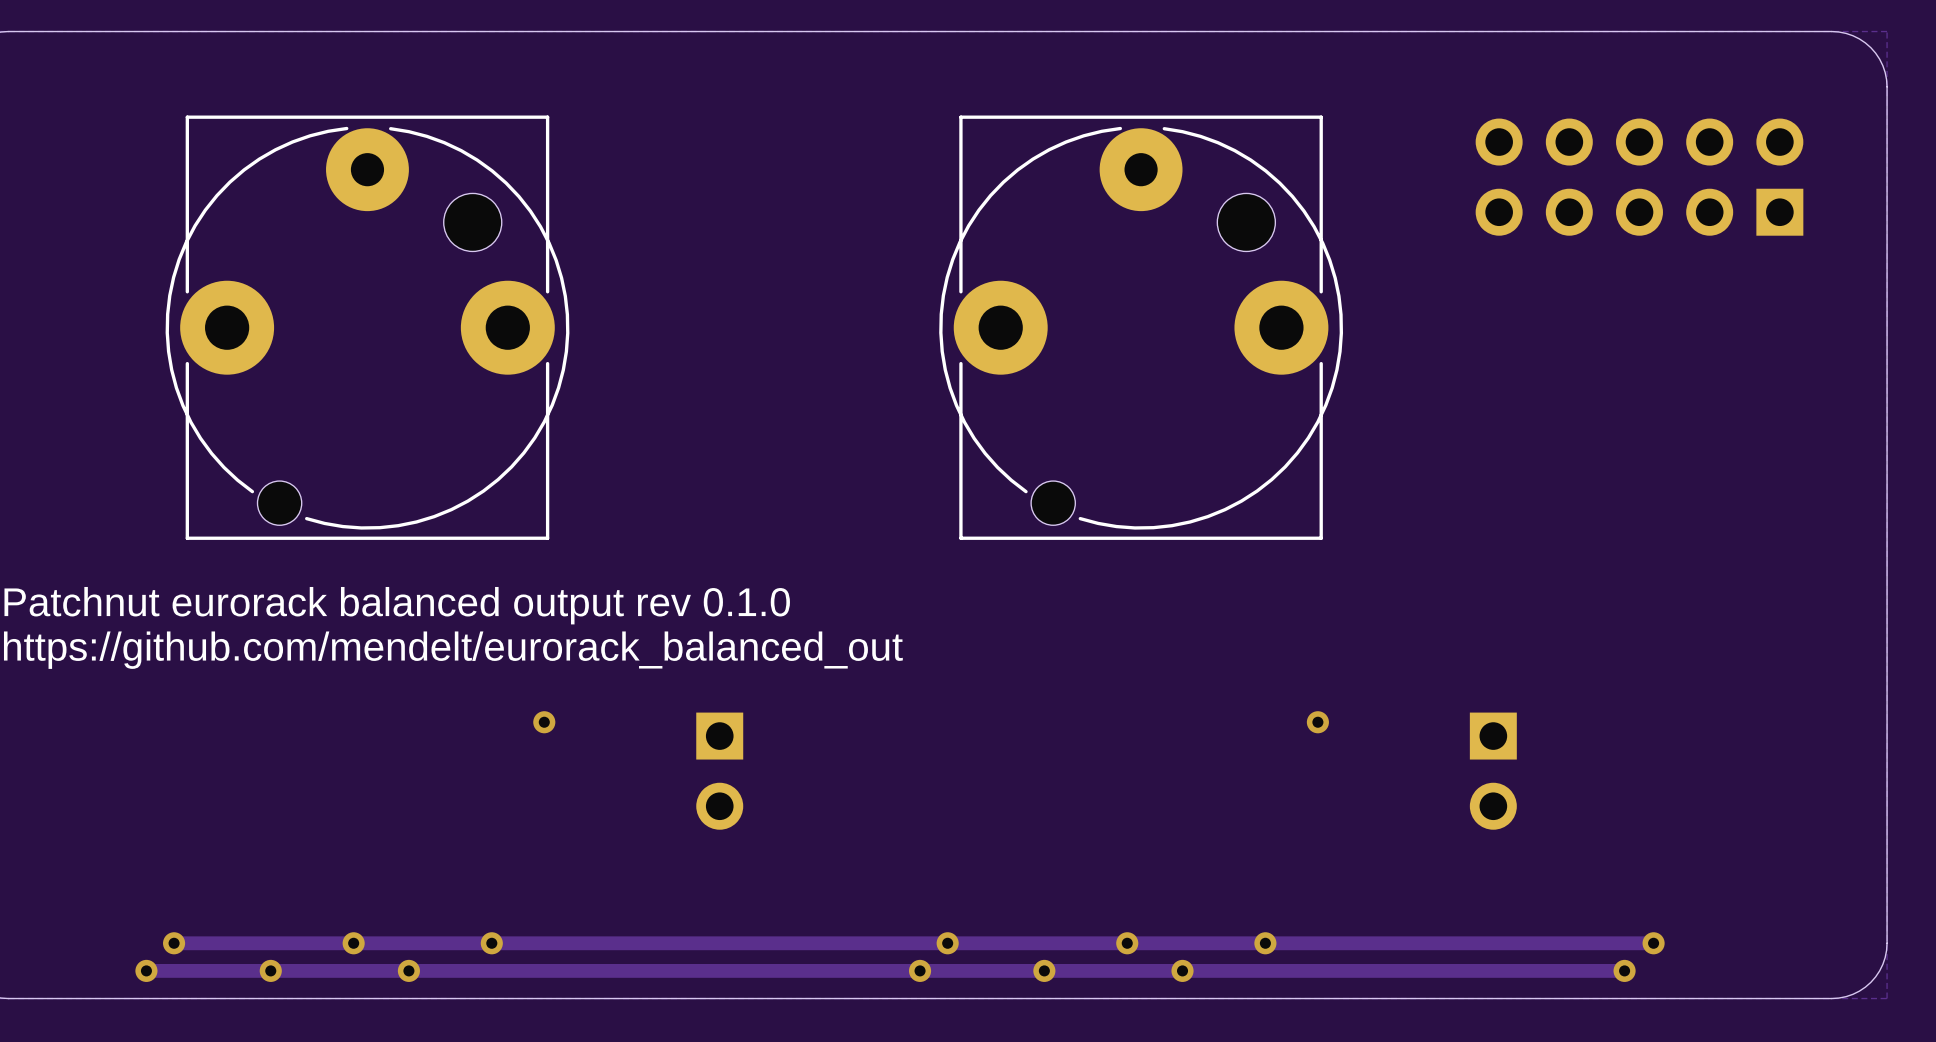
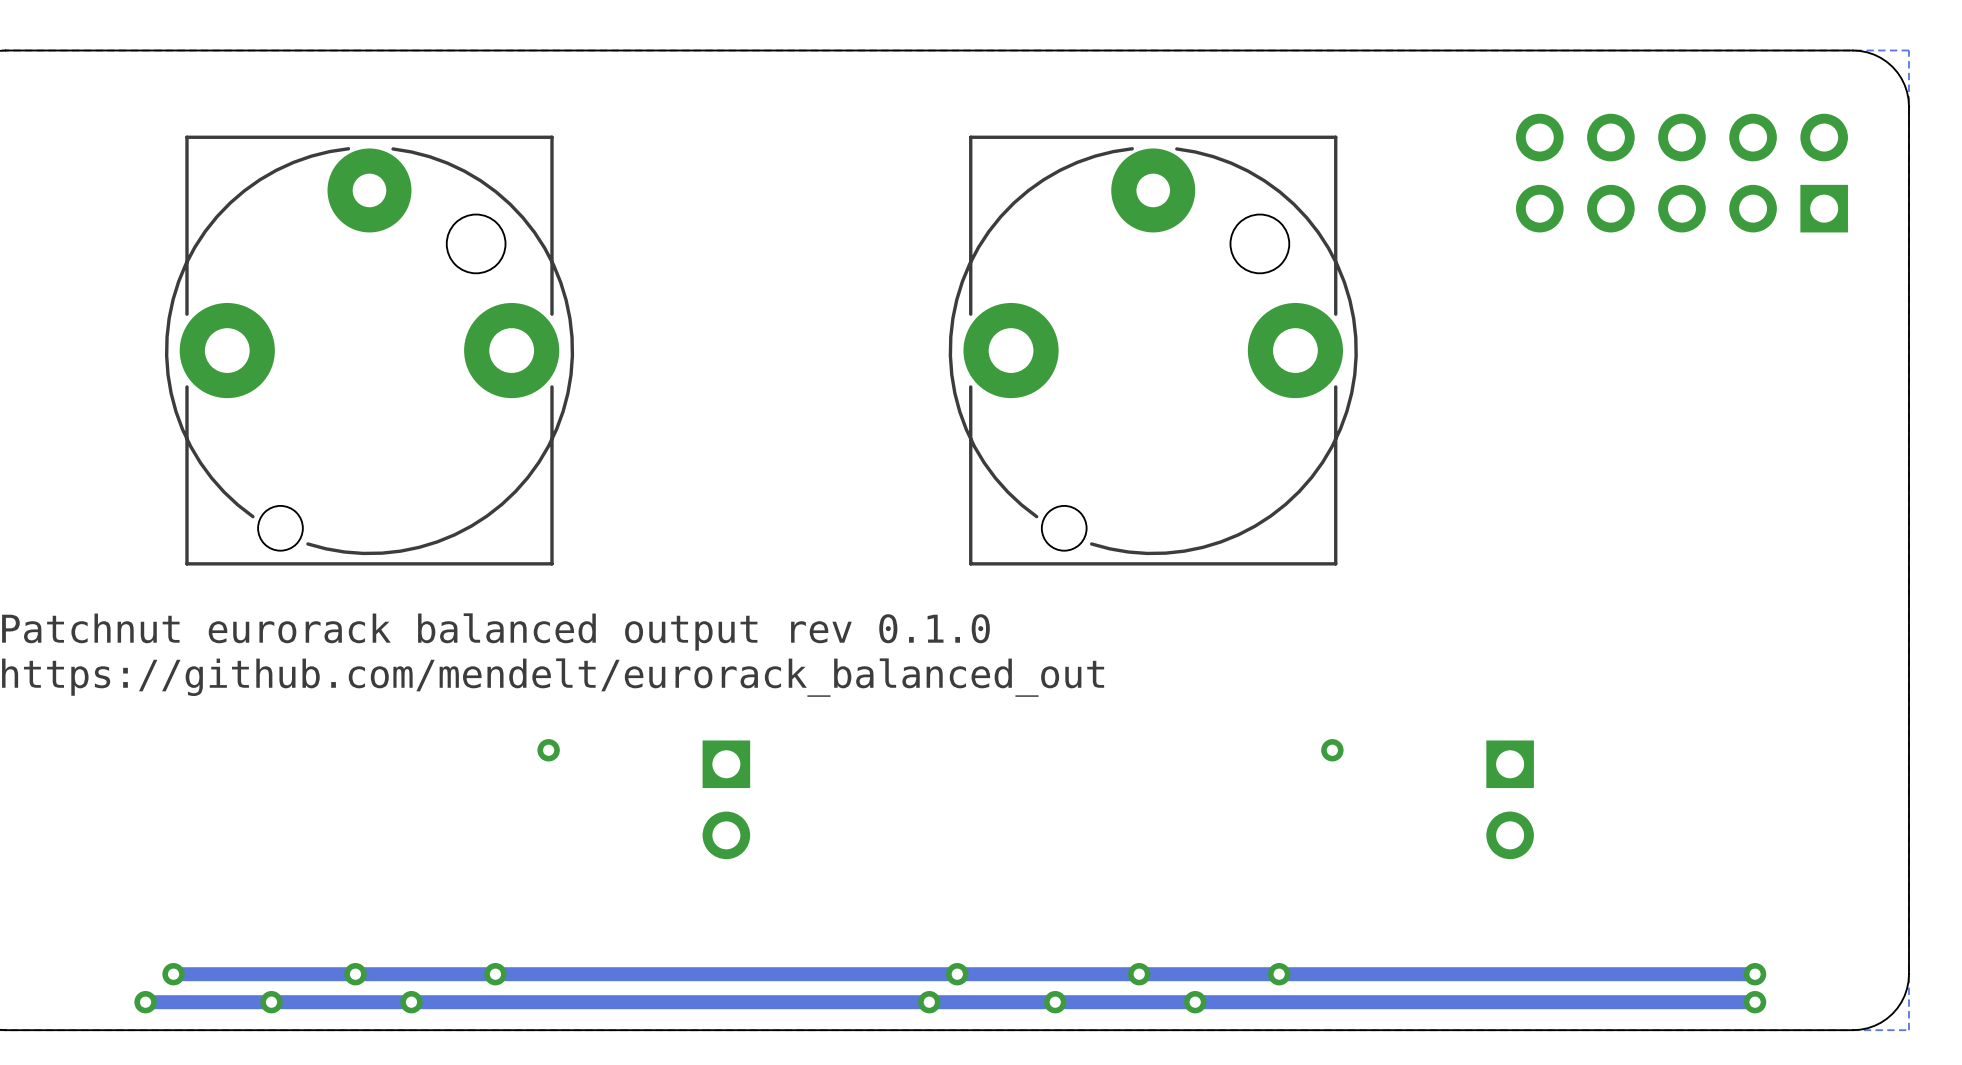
part position: (1639, 177) -> (1681, 173)
via: (1653, 943) -> none
track: none -> (1755, 974) (1672, 974)
via: none -> (1755, 974)
via: (1624, 970) -> none
track: none -> (1755, 1002) (1643, 1002)
via: none -> (1755, 1002)

